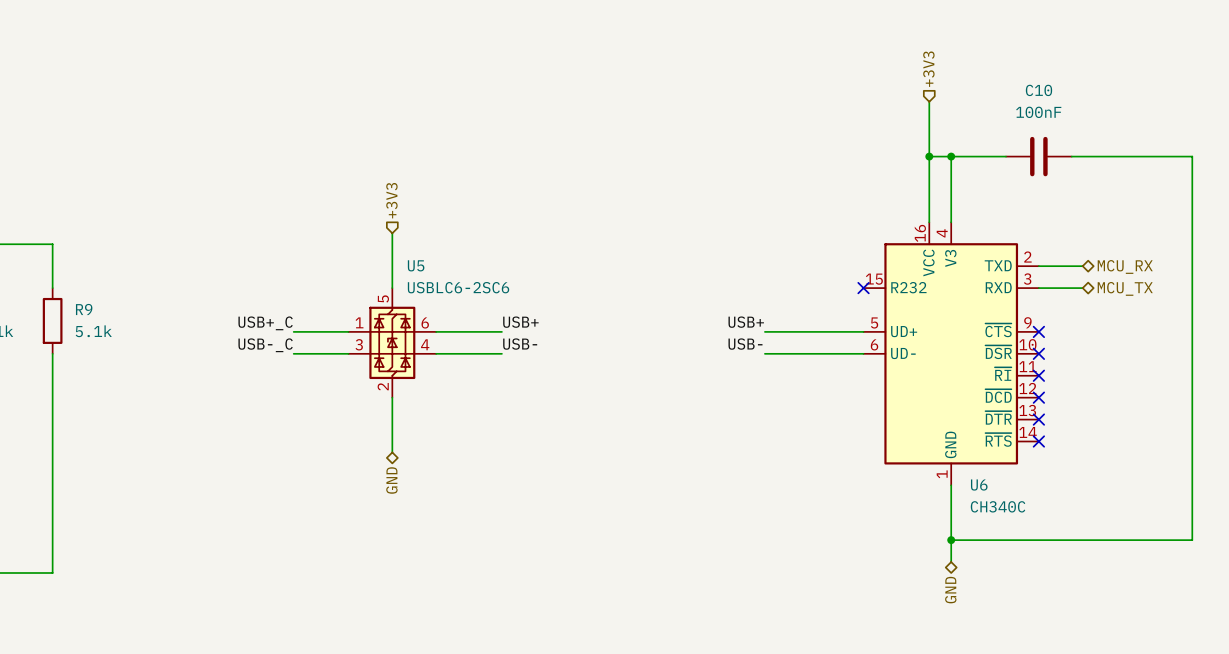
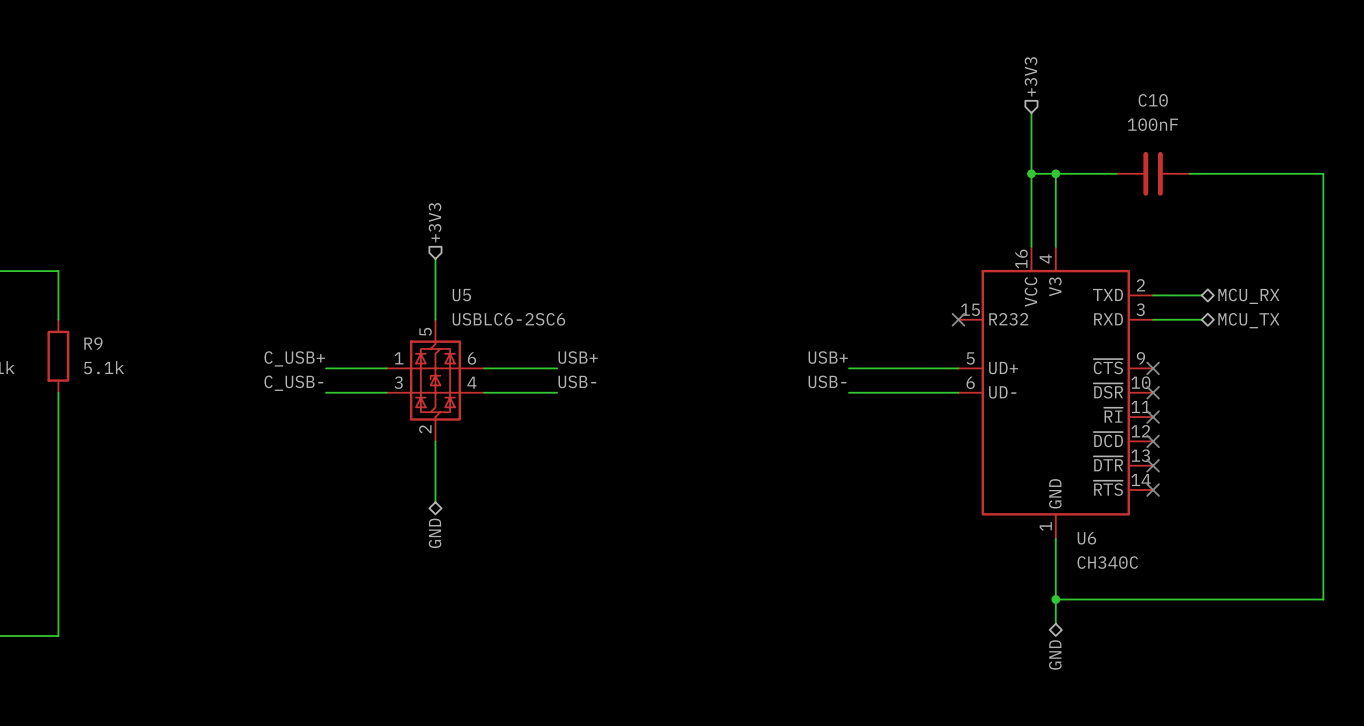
label: USB+_C (265, 323) -> C_USB+ (294, 358)
label: USB-_C (265, 345) -> C_USB- (293, 383)

